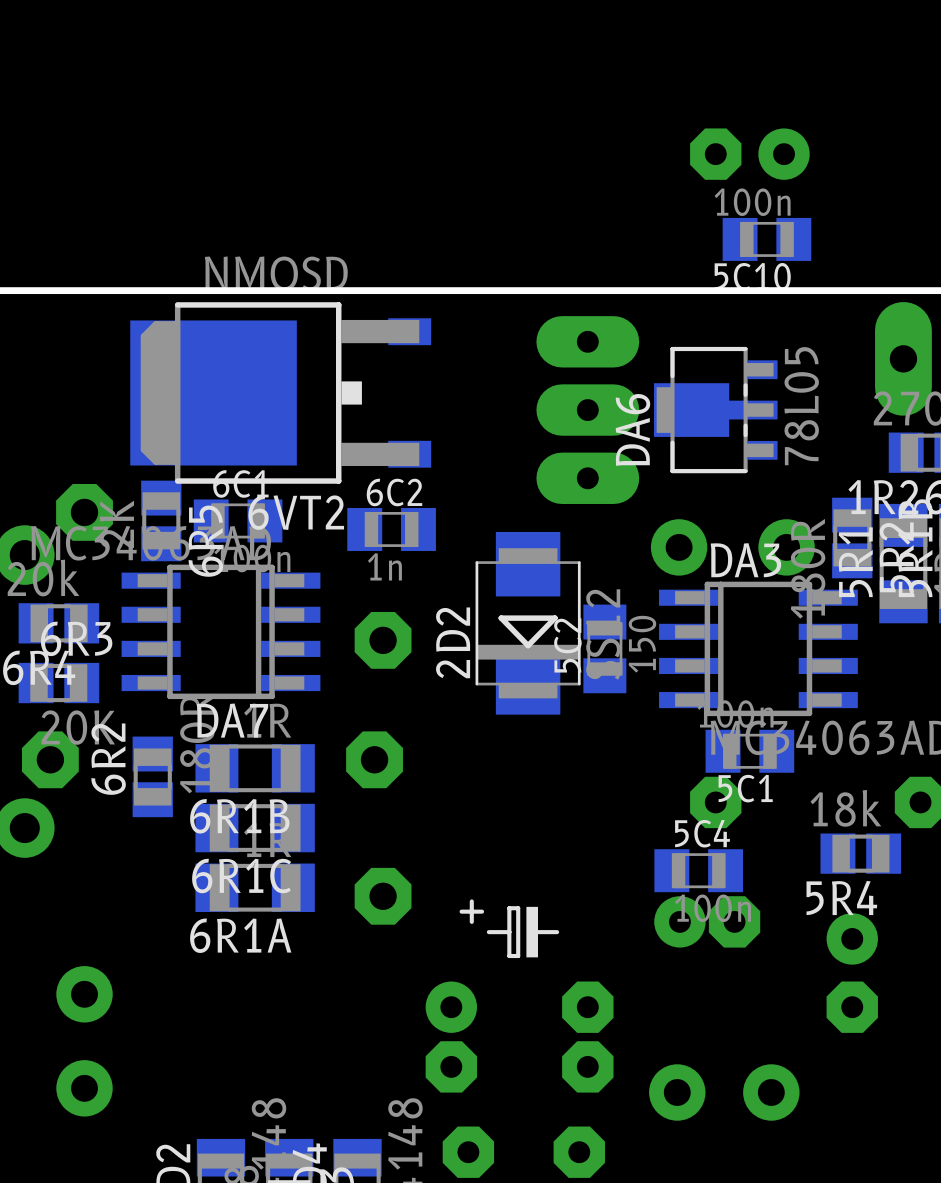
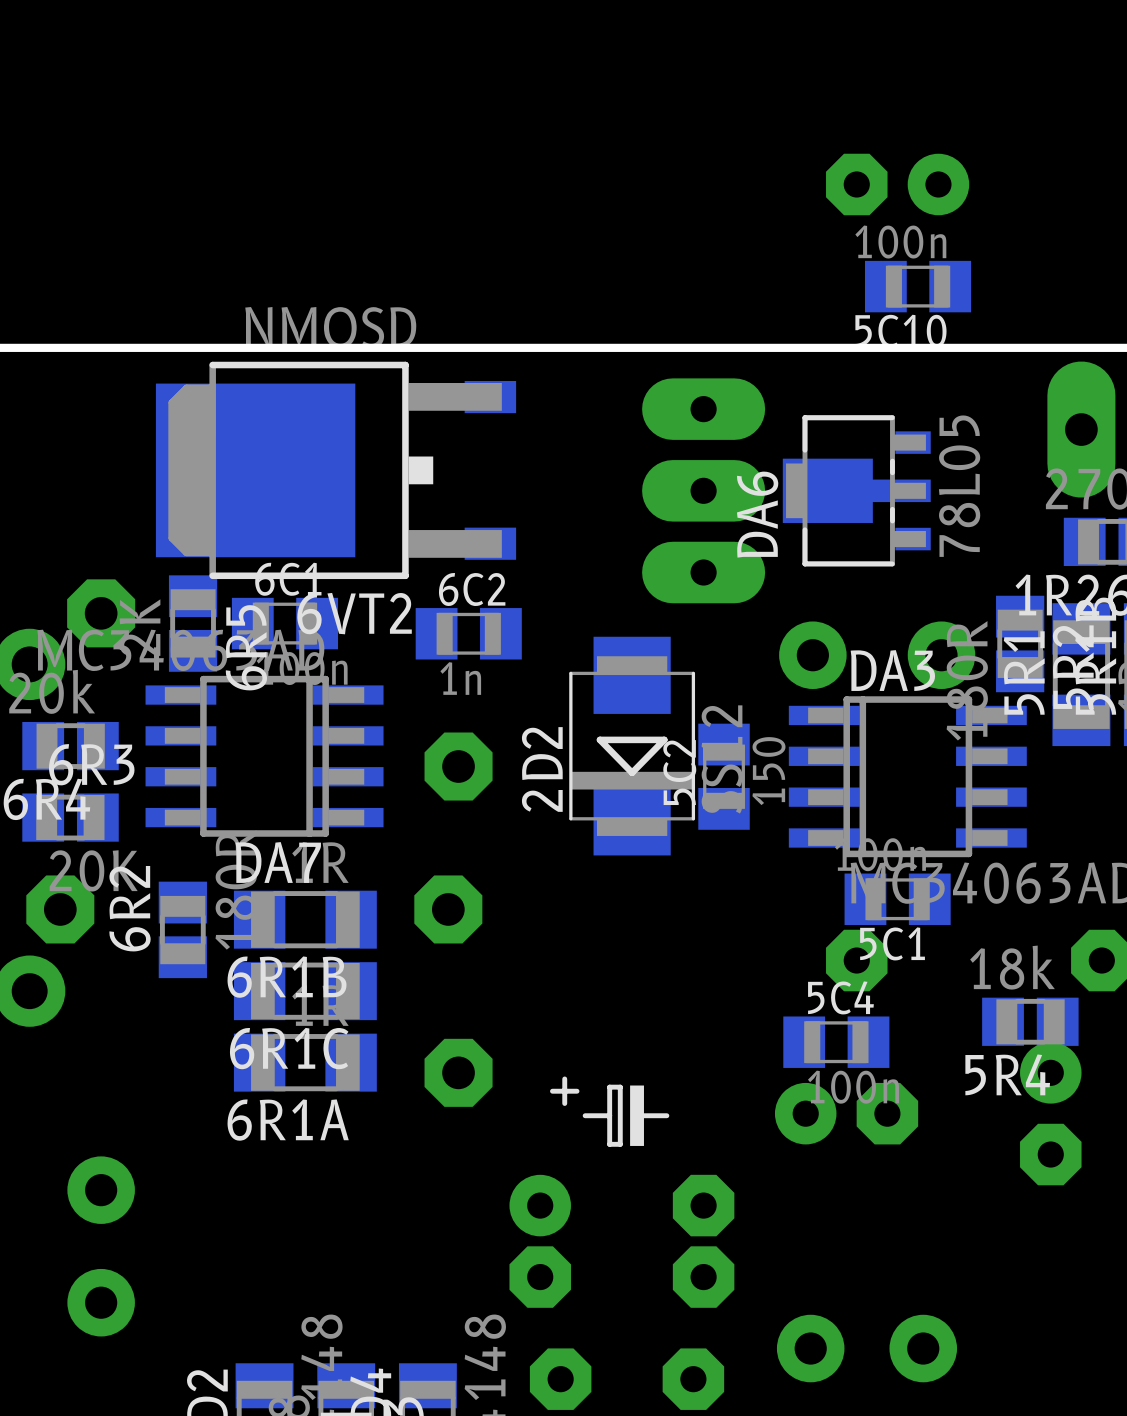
part footprint: [654, 896, 761, 948] -> [774, 1082, 919, 1145]
part position: (852, 973) -> (1050, 1113)
part position: (724, 1092) -> (866, 1348)

